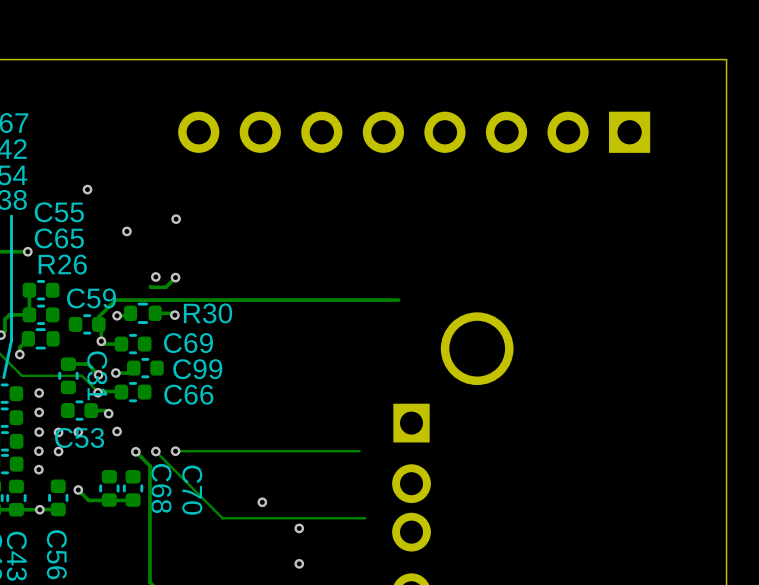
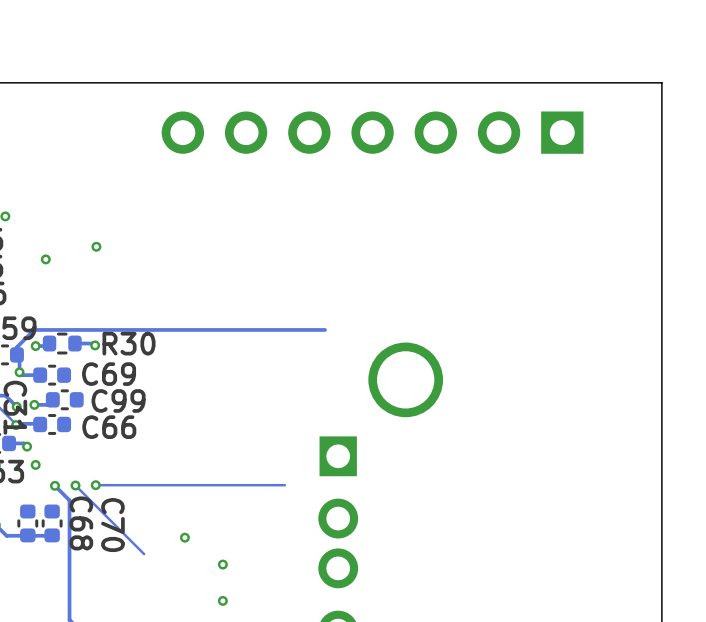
part: none -> (372, 132)
part: (414, 132) -> none
via: (155, 276) -> none
track: (175, 277) (165, 287) (150, 286) -> none
via: (175, 277) -> none
track: (365, 518) (222, 518) -> none

